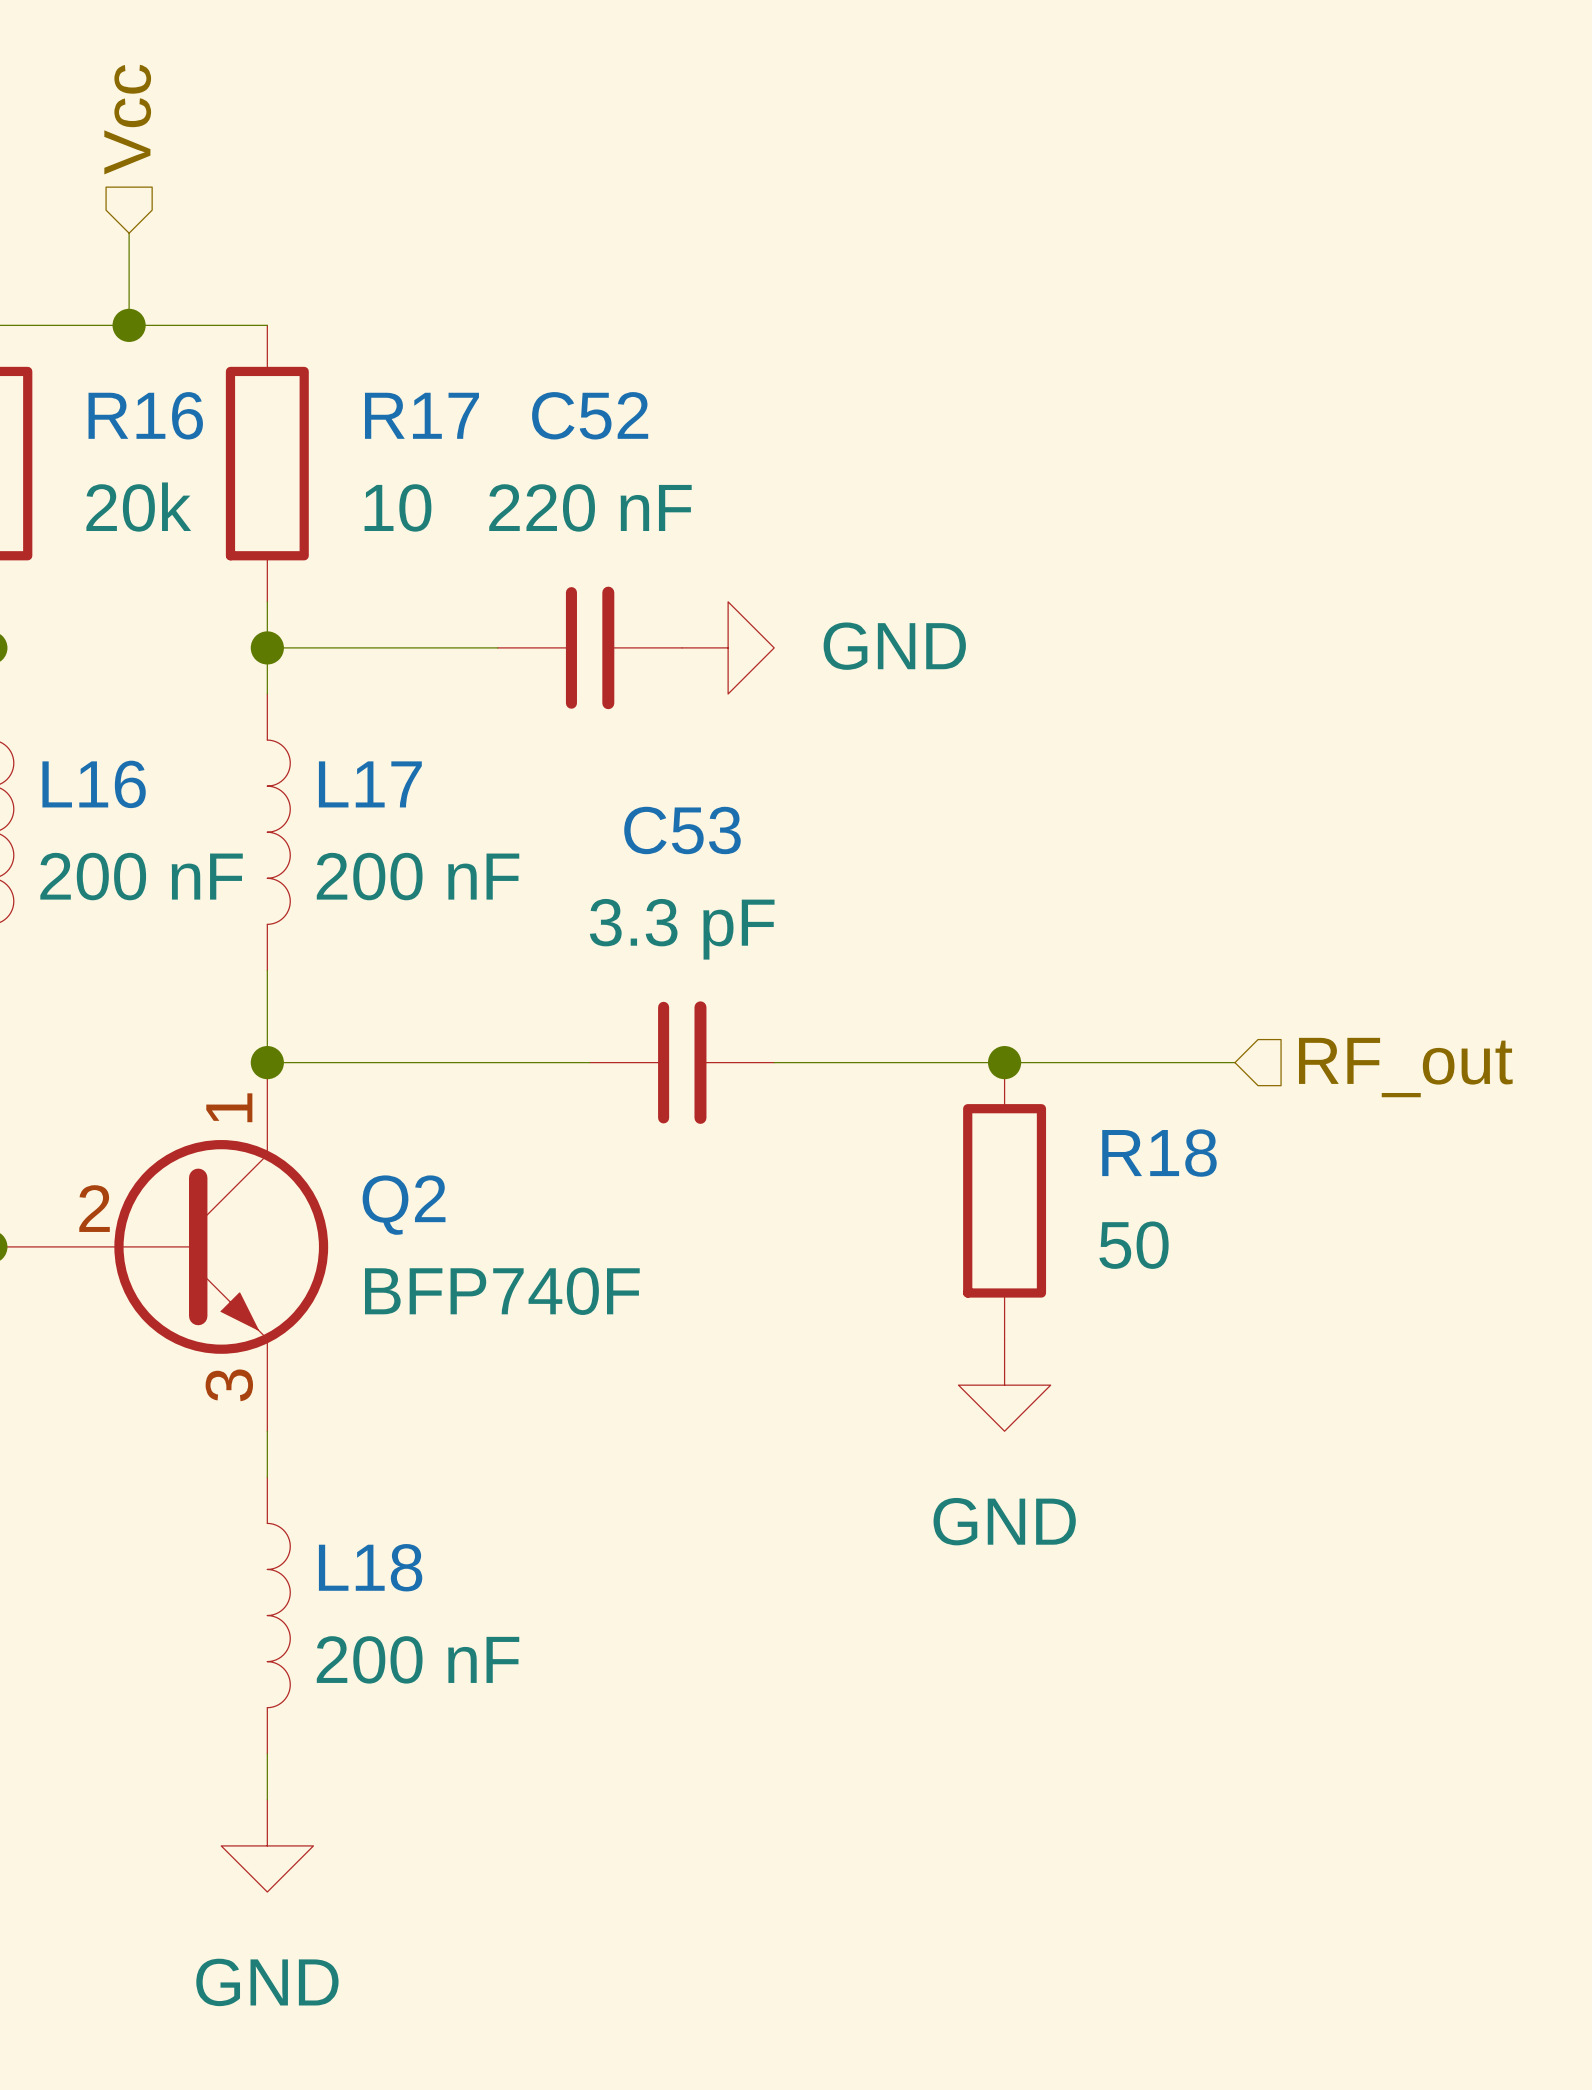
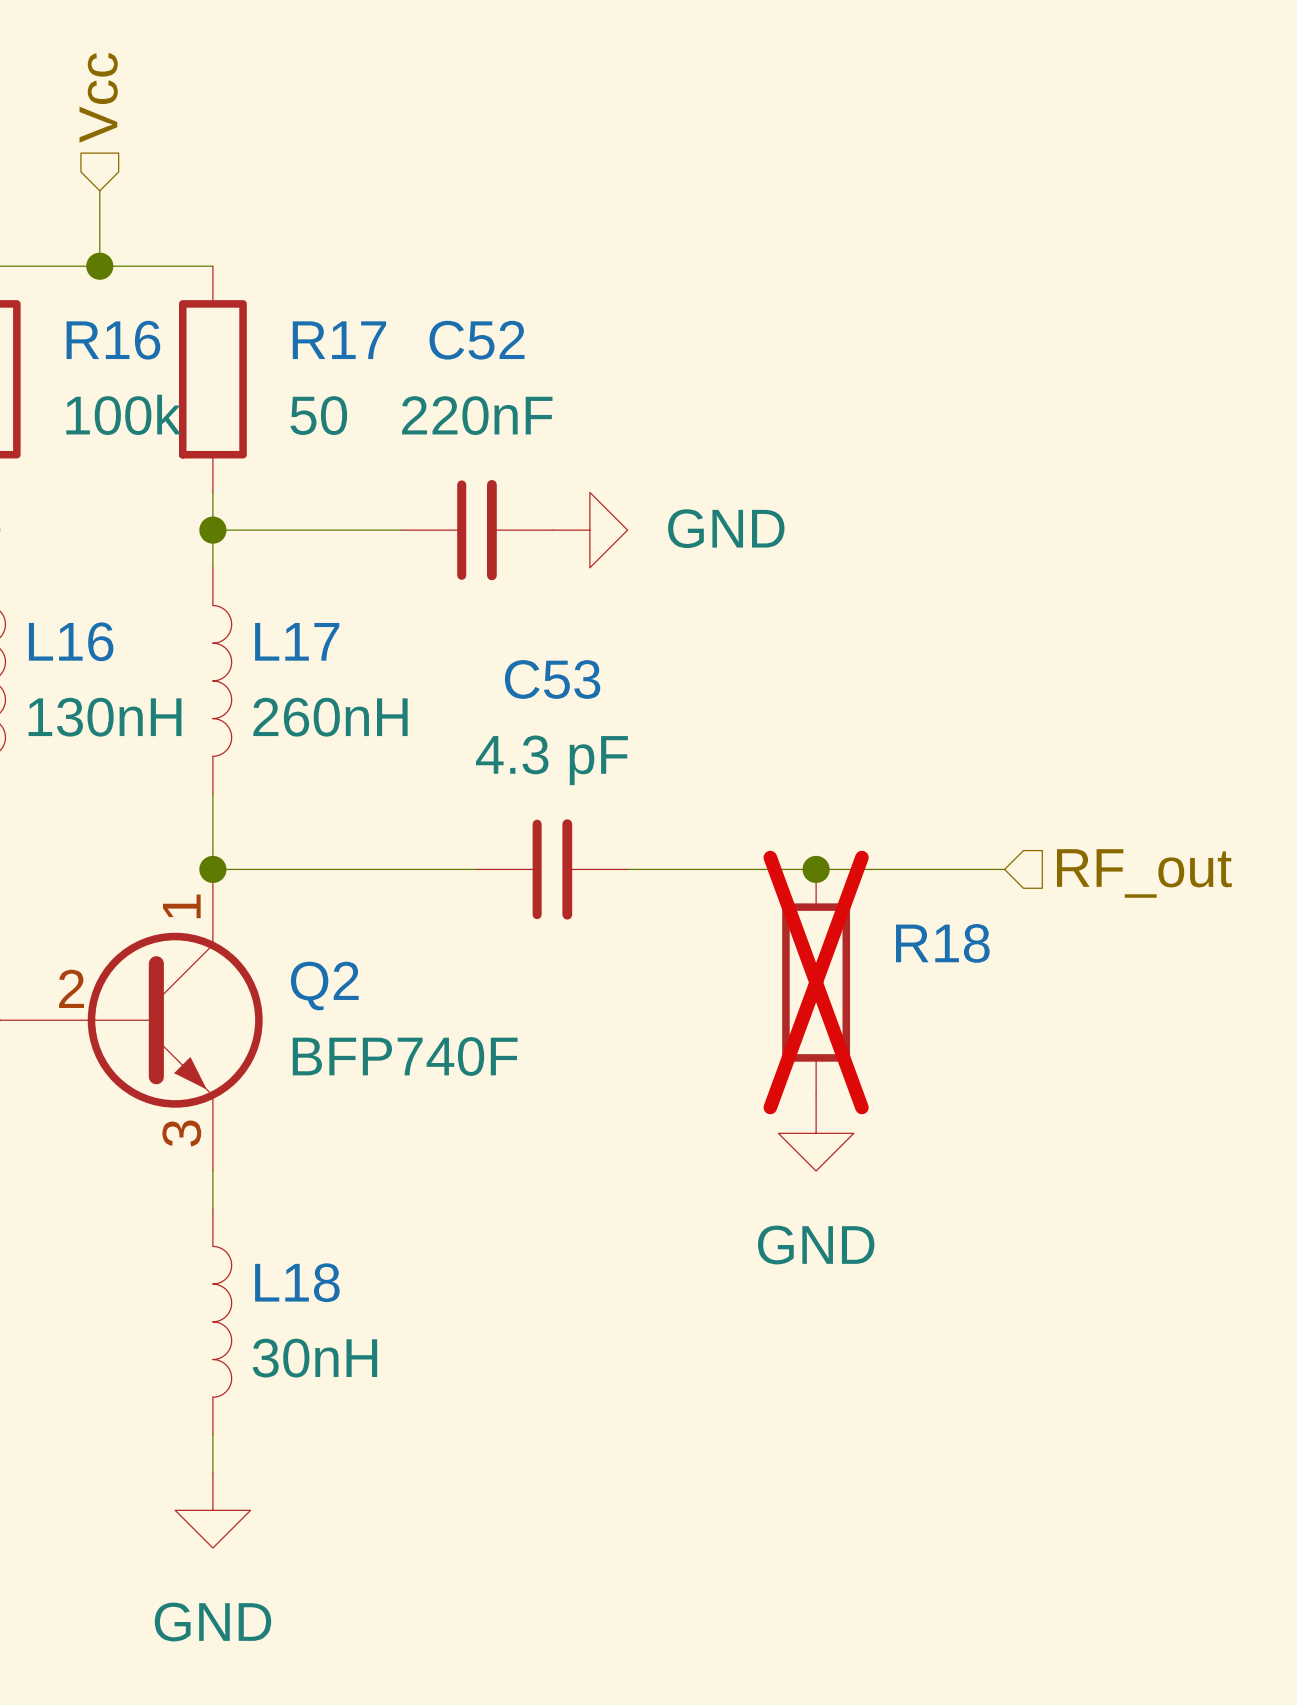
R16 value: 20k (138, 507) -> 100k (123, 414)
R17 value: 10 (397, 507) -> 50 (318, 415)
C52 value: 220 nF (590, 507) -> 220nF (477, 415)
L16 value: 200 nF (141, 876) -> 130nH (104, 717)
L17 value: 200 nF (418, 876) -> 260nH (330, 717)
C53 value: 3.3 pF (682, 929) -> 4.3 pF (551, 760)
R18 do-not-place cross: none -> (816, 982)
R18 value: 50 (1134, 1245) -> none
L18 value: 200 nF (418, 1659) -> 30nH (314, 1358)

